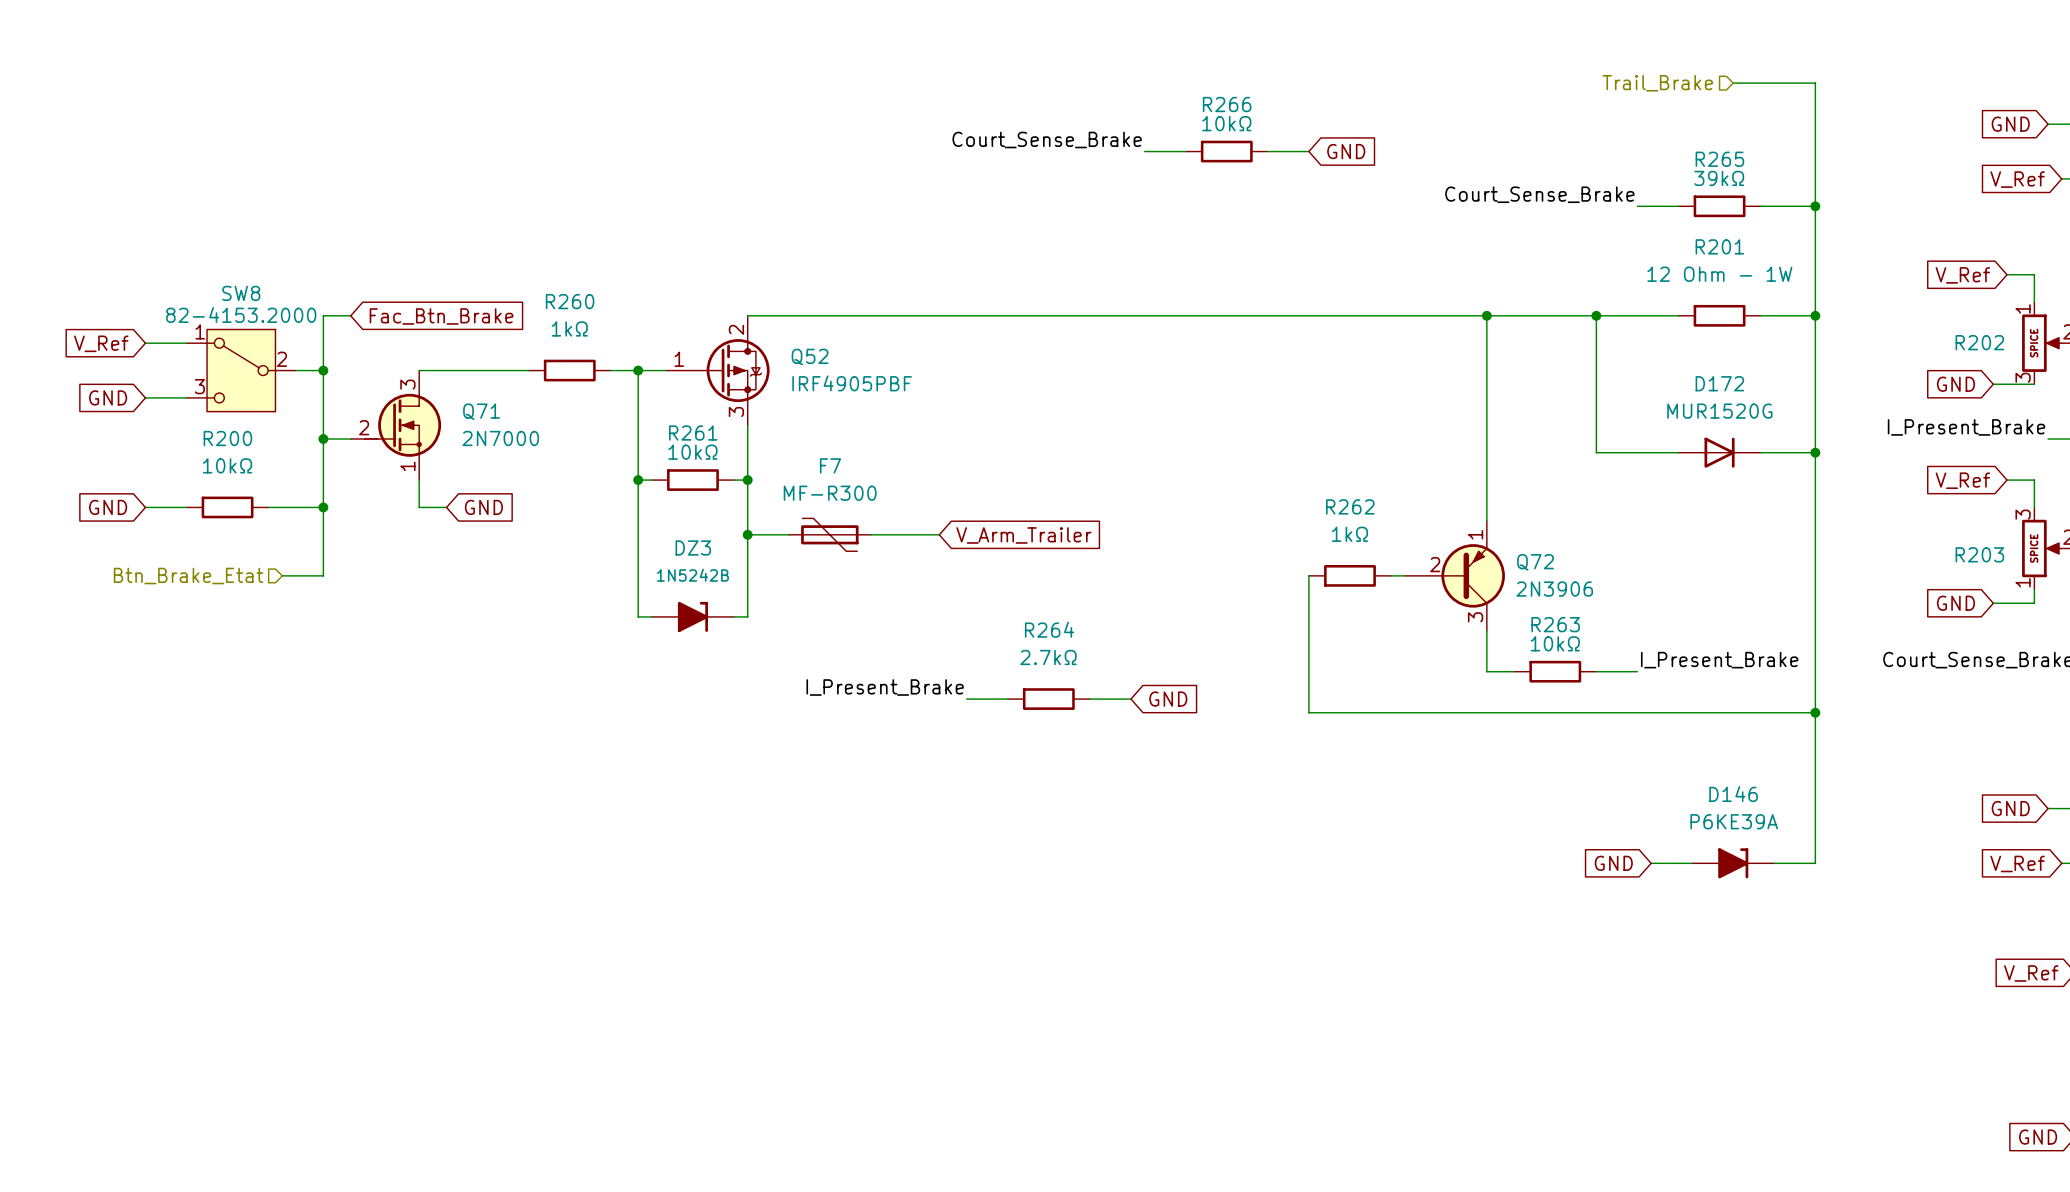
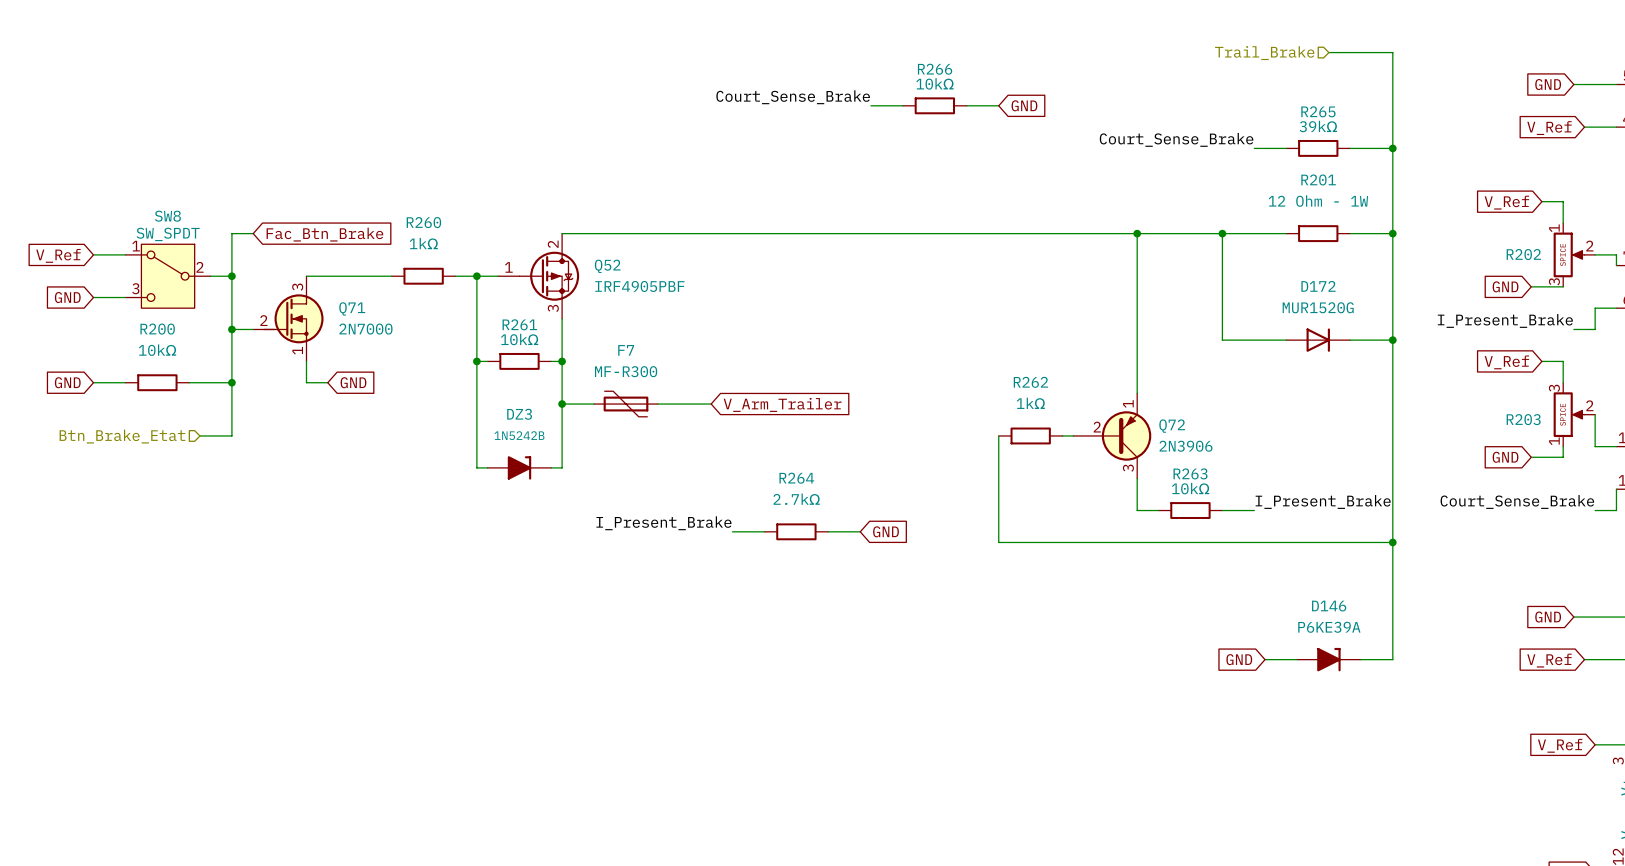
SW8 value: 82-4153.2000 (241, 314) -> SW_SPDT (168, 234)

